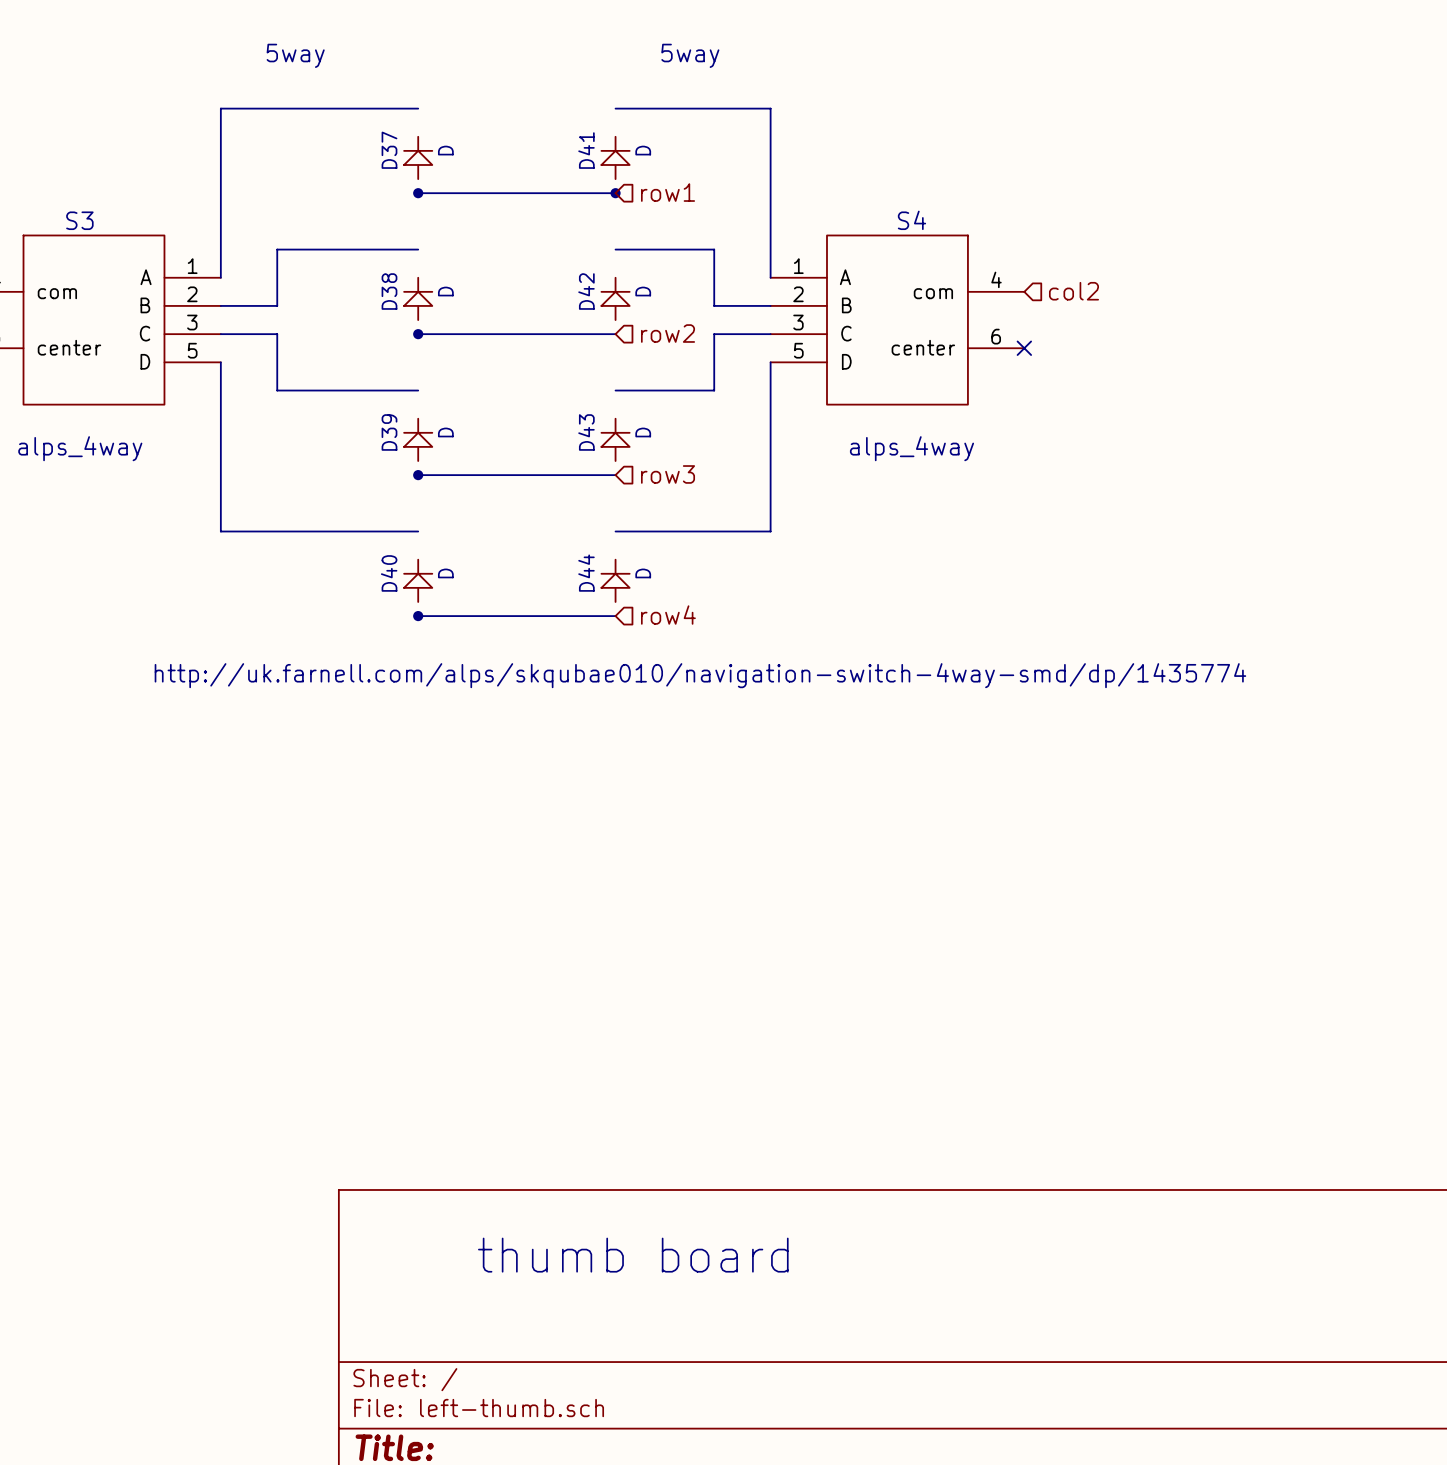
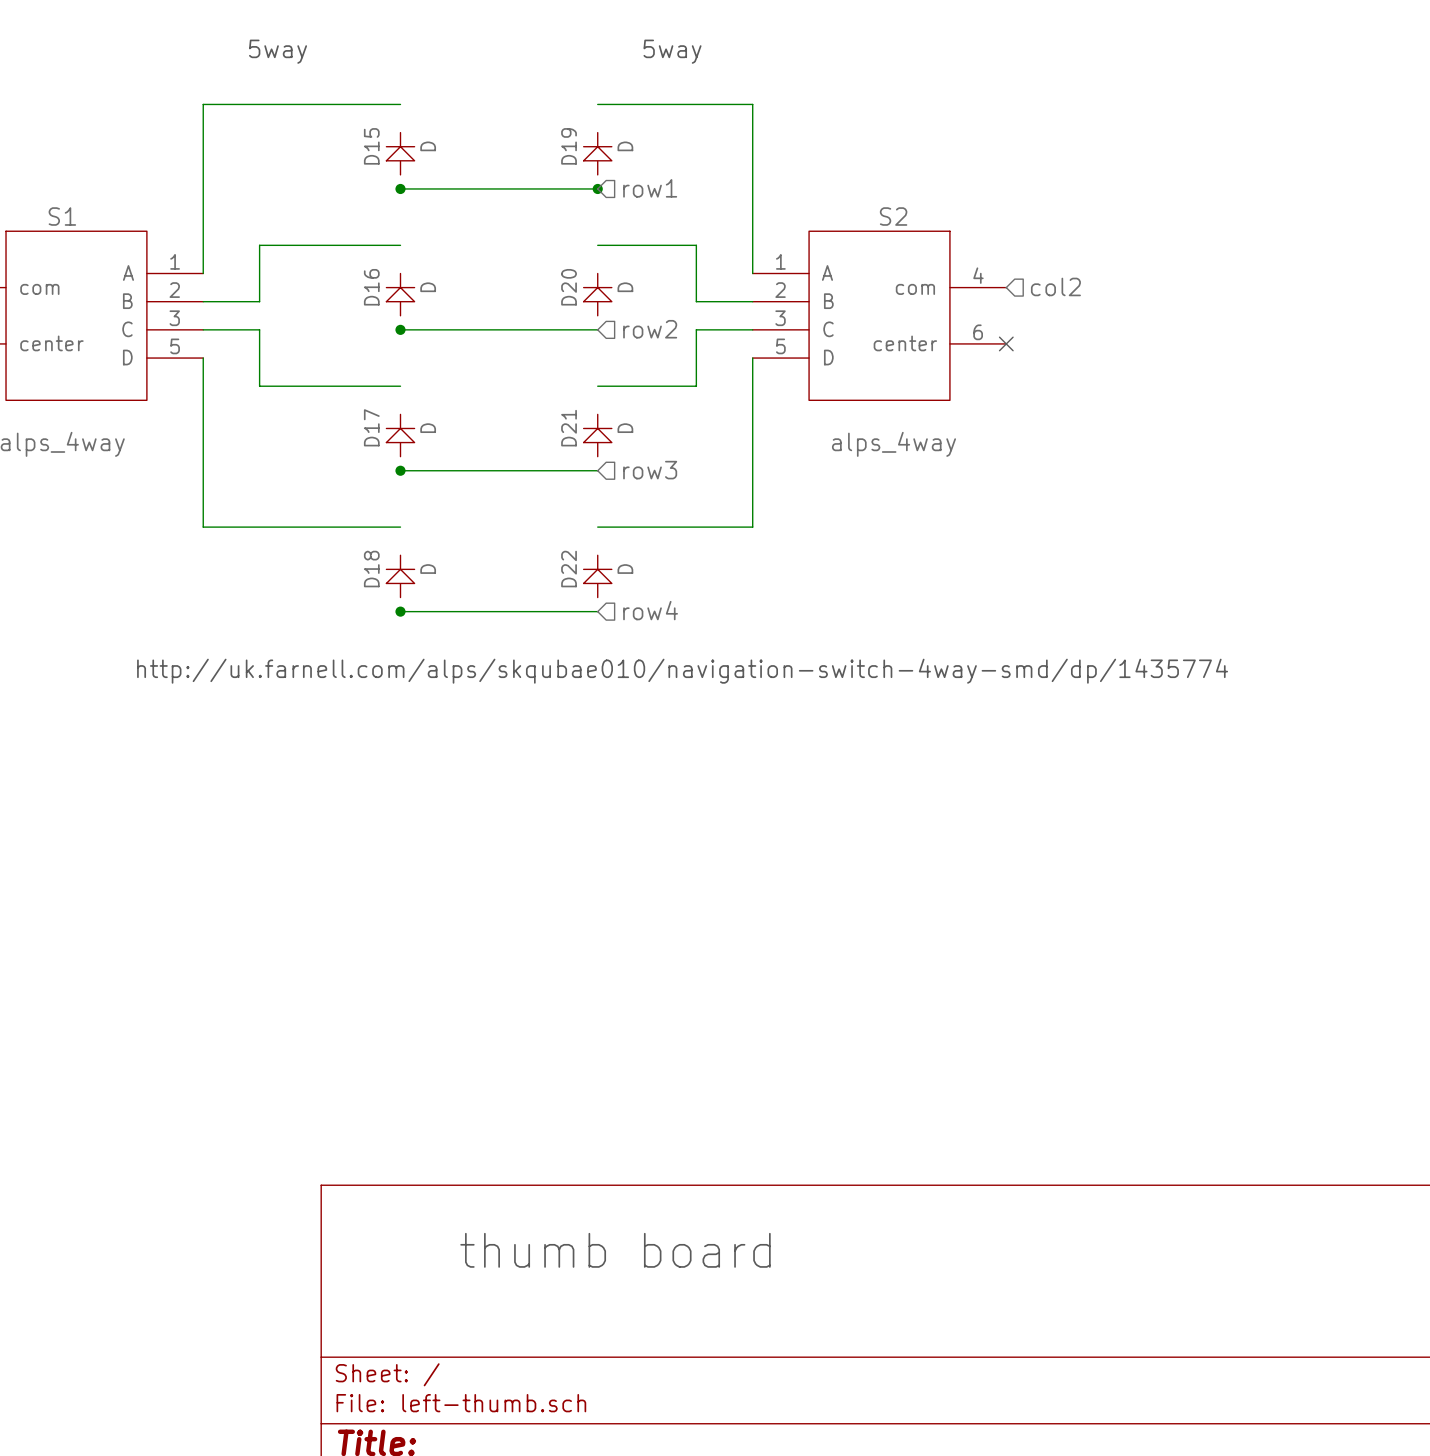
D37 name: D37 (389, 150) -> D15 (371, 146)
D41 name: D41 (586, 150) -> D19 (569, 146)
S3 name: S3 (79, 220) -> S1 (62, 216)
S4 name: S4 (911, 220) -> S2 (893, 216)
D38 name: D38 (389, 291) -> D16 (371, 287)
D42 name: D42 (586, 291) -> D20 (569, 287)
D39 name: D39 (389, 432) -> D17 (371, 427)
D43 name: D43 (586, 432) -> D21 (569, 428)
D40 name: D40 (389, 573) -> D18 (371, 569)
D44 name: D44 (586, 573) -> D22 (569, 569)

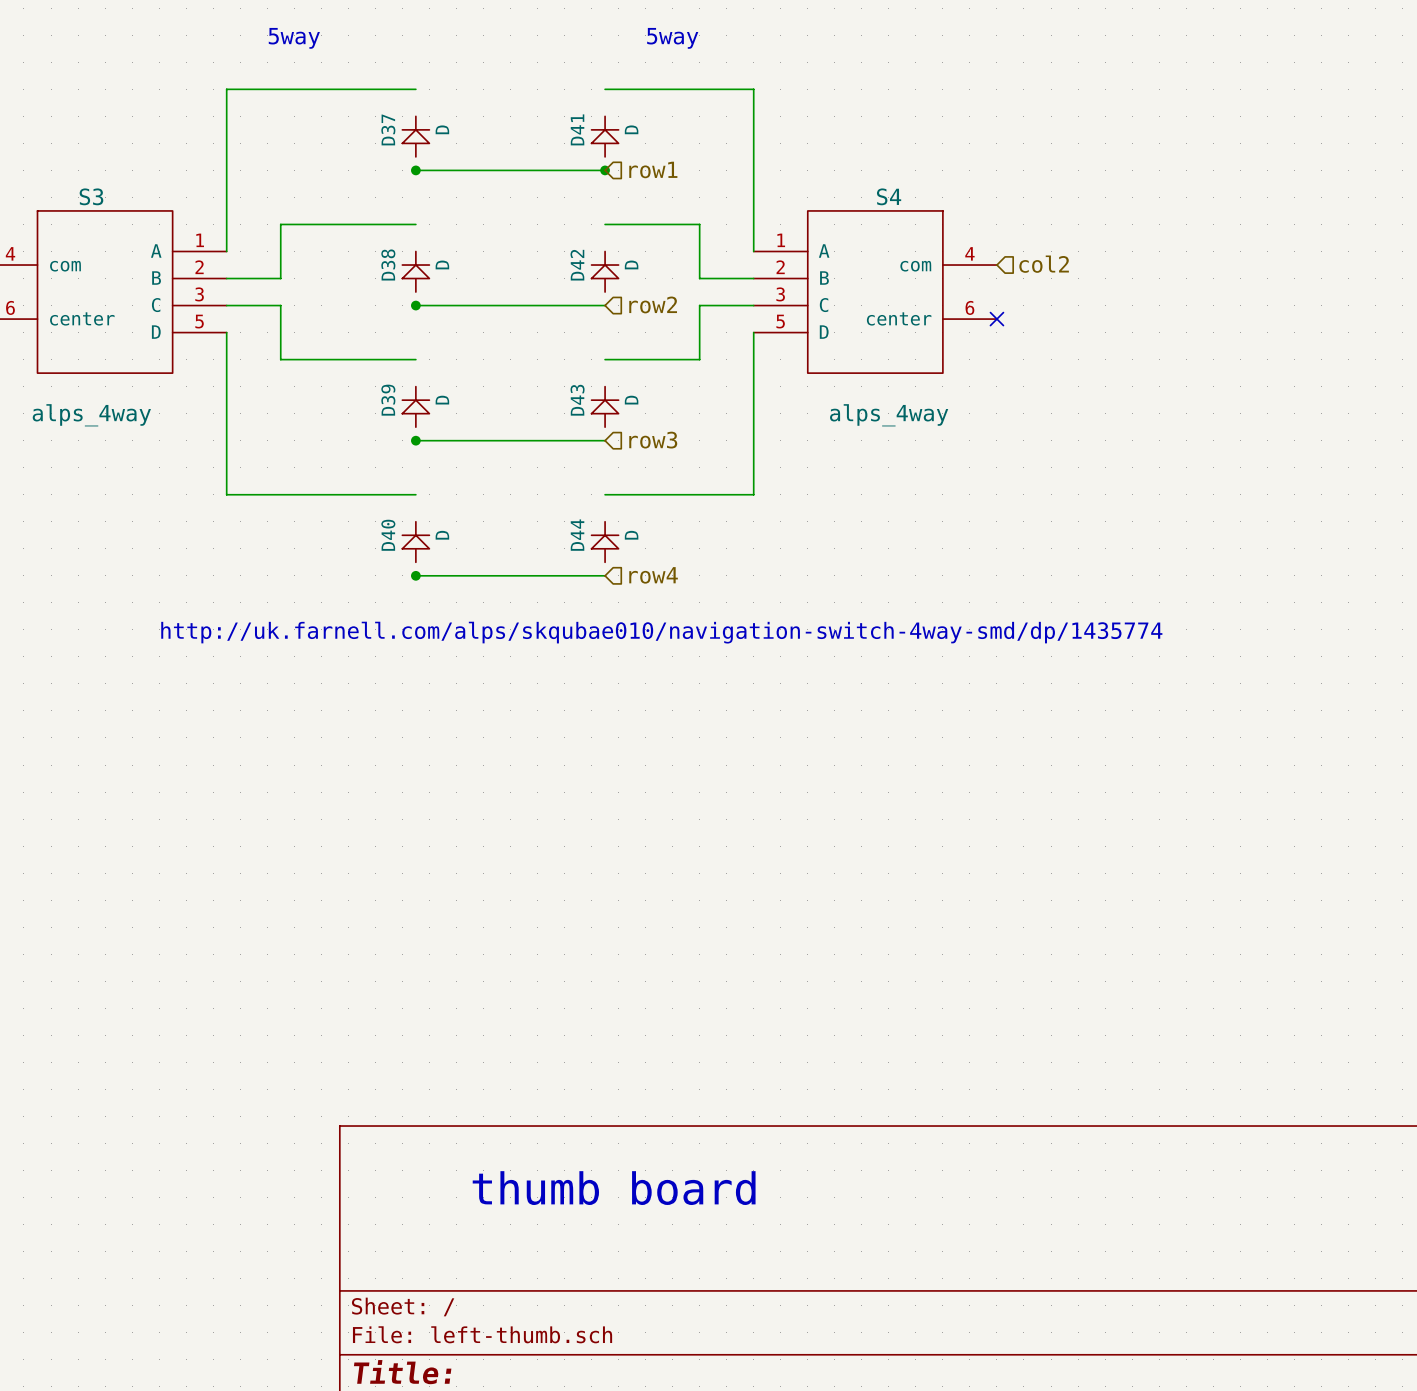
D15 name: D15 (371, 146) -> D37 (388, 129)
D19 name: D19 (569, 146) -> D41 (577, 129)
S1 name: S1 (62, 216) -> S3 (91, 196)
S2 name: S2 (893, 216) -> S4 (889, 196)
D16 name: D16 (371, 287) -> D38 (388, 264)
D20 name: D20 (569, 287) -> D42 (577, 265)
D17 name: D17 (371, 427) -> D39 (388, 400)
D21 name: D21 (569, 428) -> D43 (577, 400)
D18 name: D18 (371, 569) -> D40 (388, 535)
D22 name: D22 (569, 569) -> D44 (577, 535)

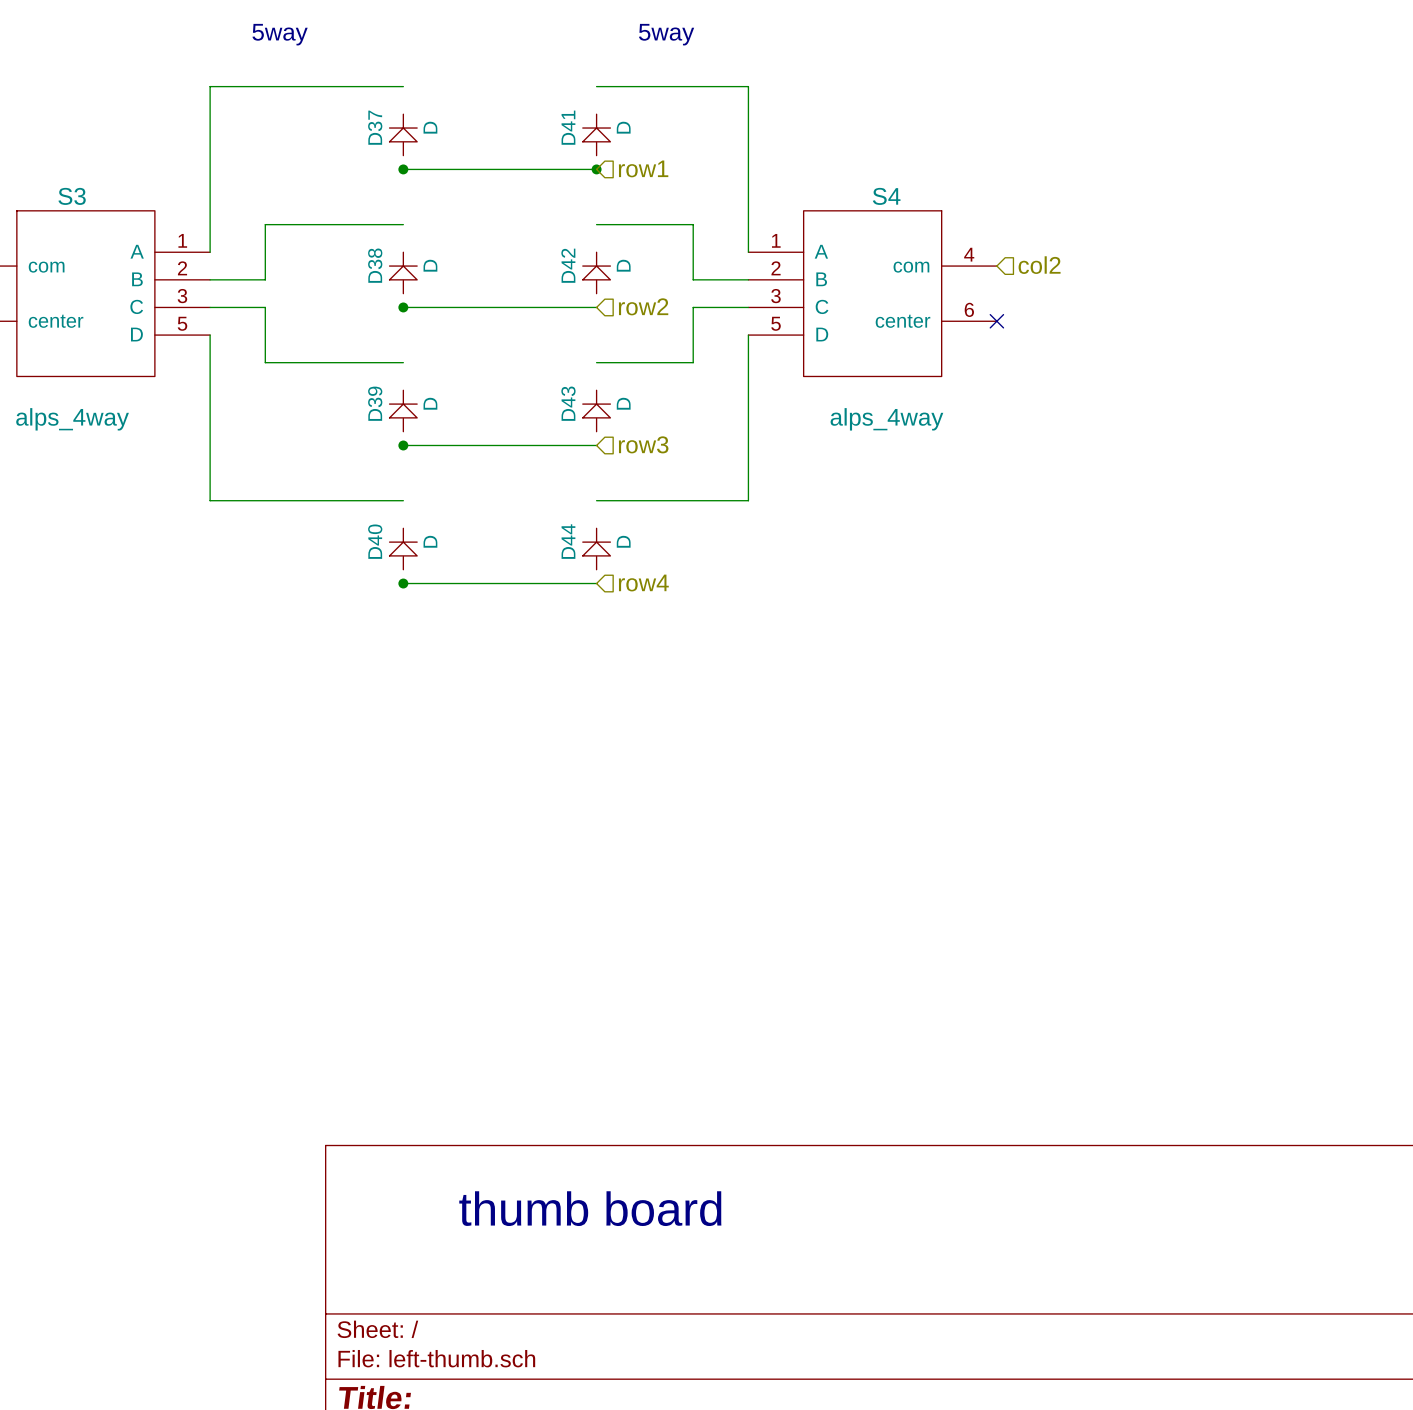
text: http://uk.farnell.com/alps/skqubae010/navigation-switch-4way-smd/dp/1435774 (661, 632) -> none

